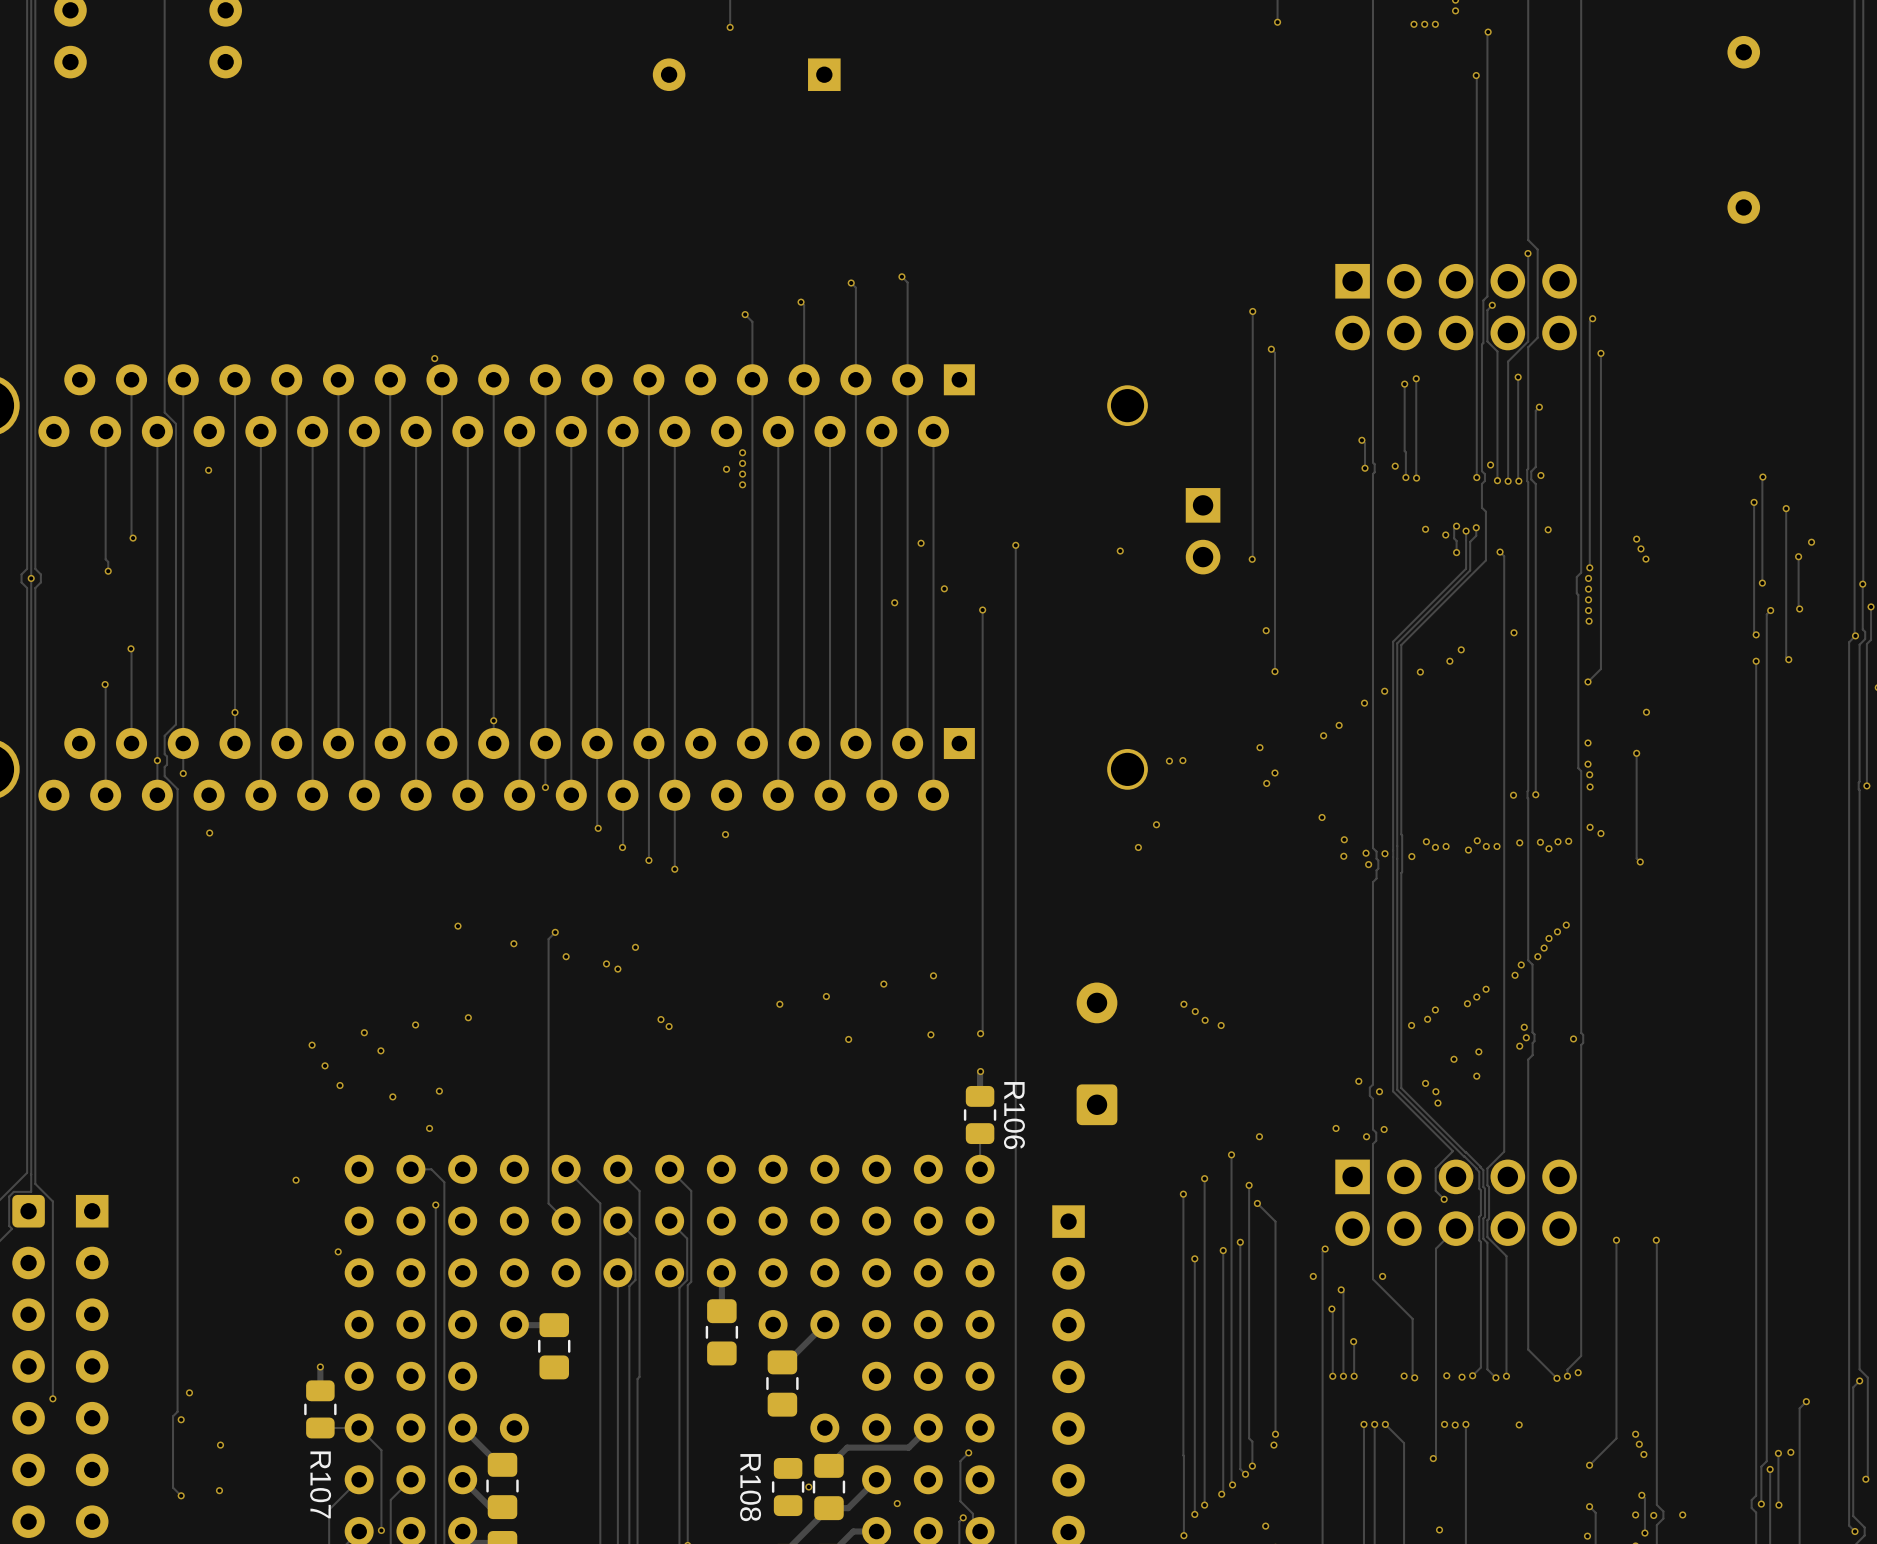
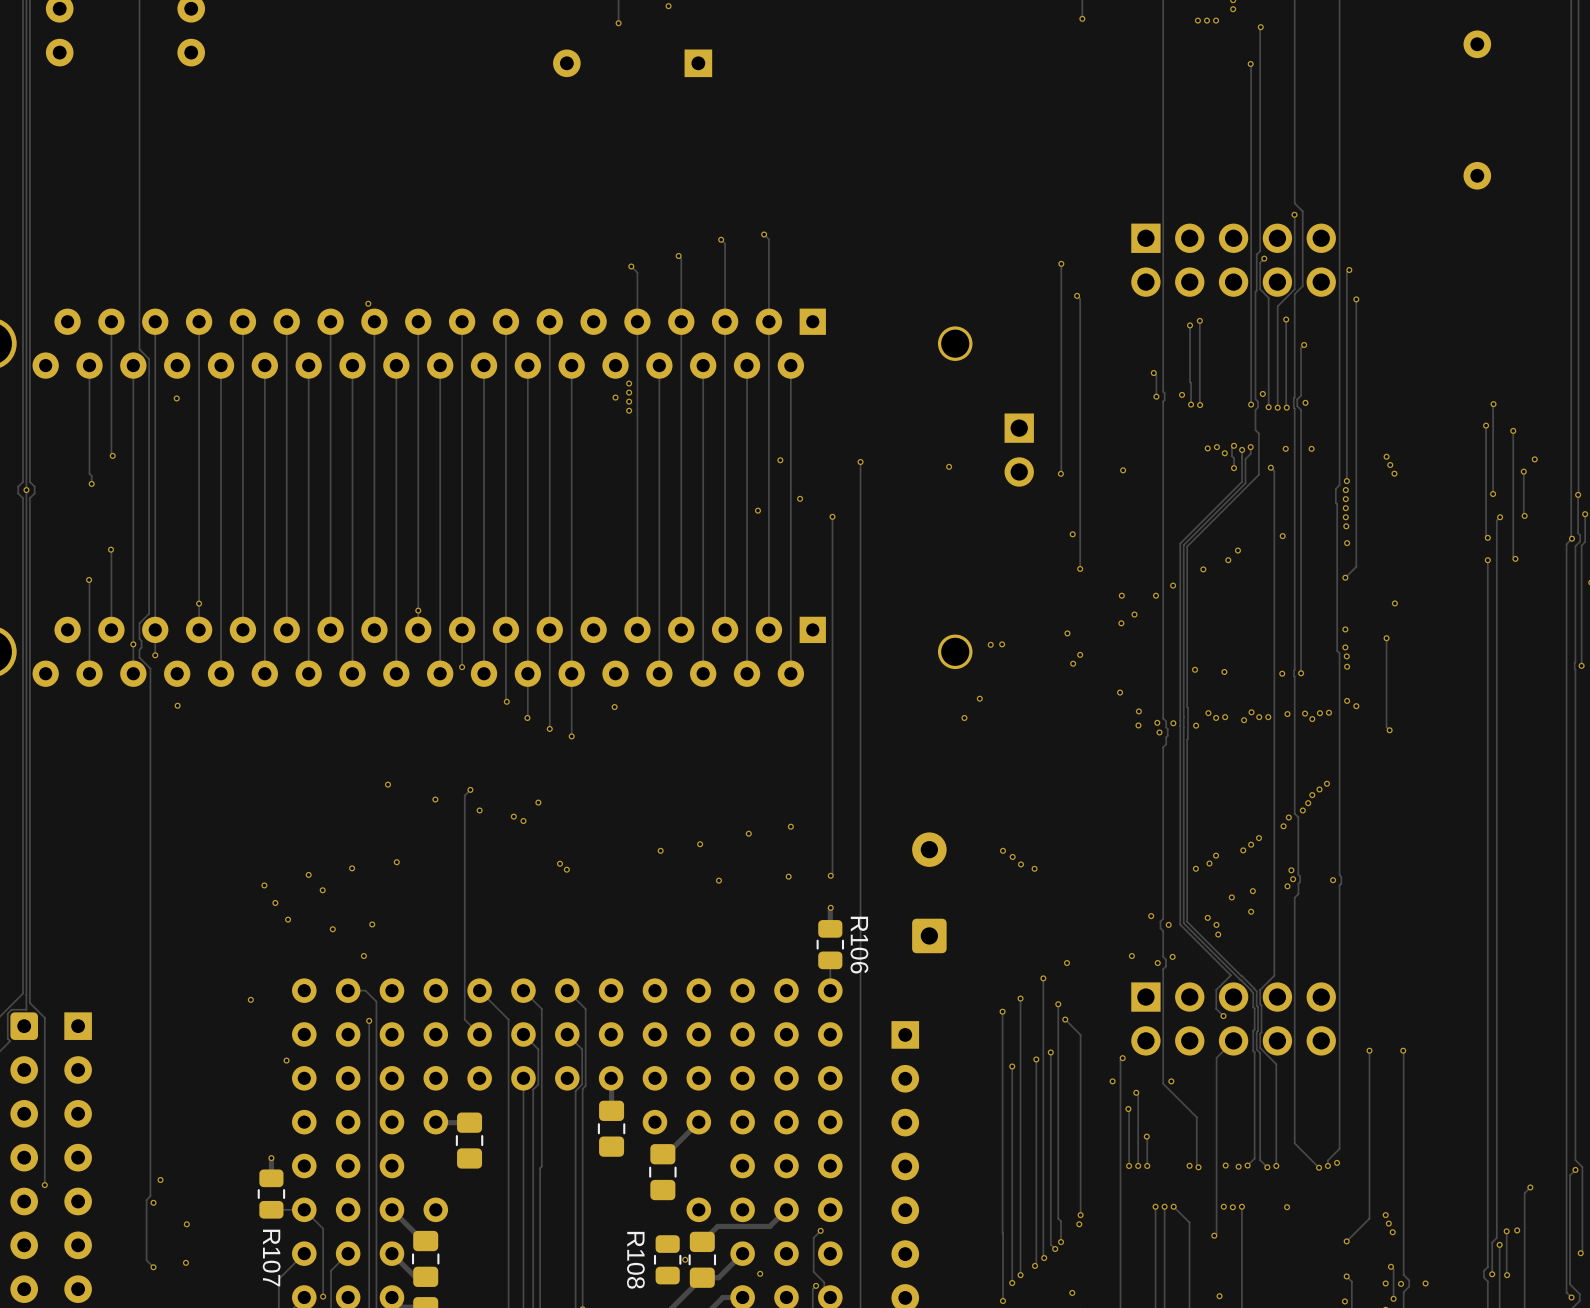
via: none -> (668, 6)
via: none -> (1216, 447)
via: none -> (1285, 448)
via: none -> (1123, 470)
via: none -> (1347, 543)
via: none -> (1121, 595)
via: none -> (1195, 669)
via: none -> (1224, 671)

